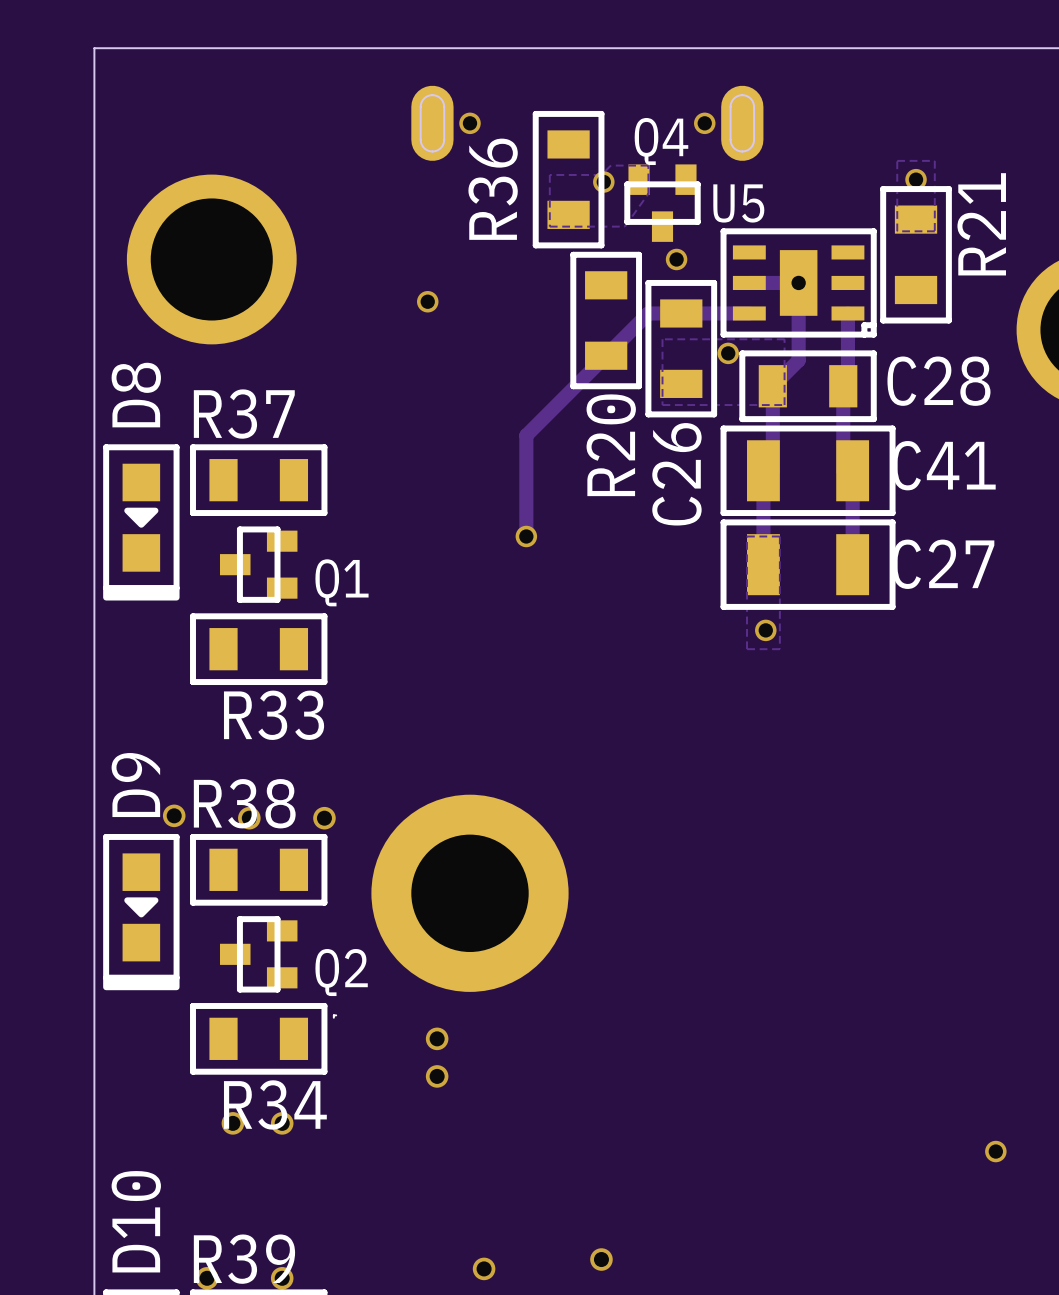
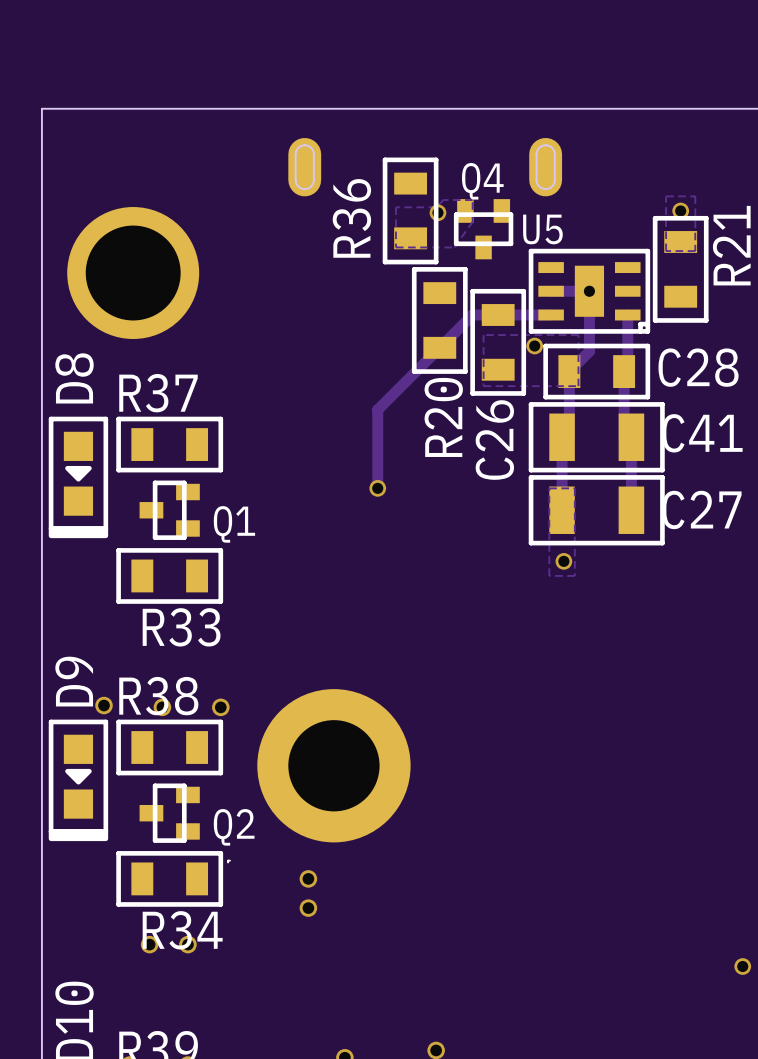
via: (470, 123) -> none
via: (704, 123) -> none
via: (676, 259) -> none
via: (427, 301) -> none

